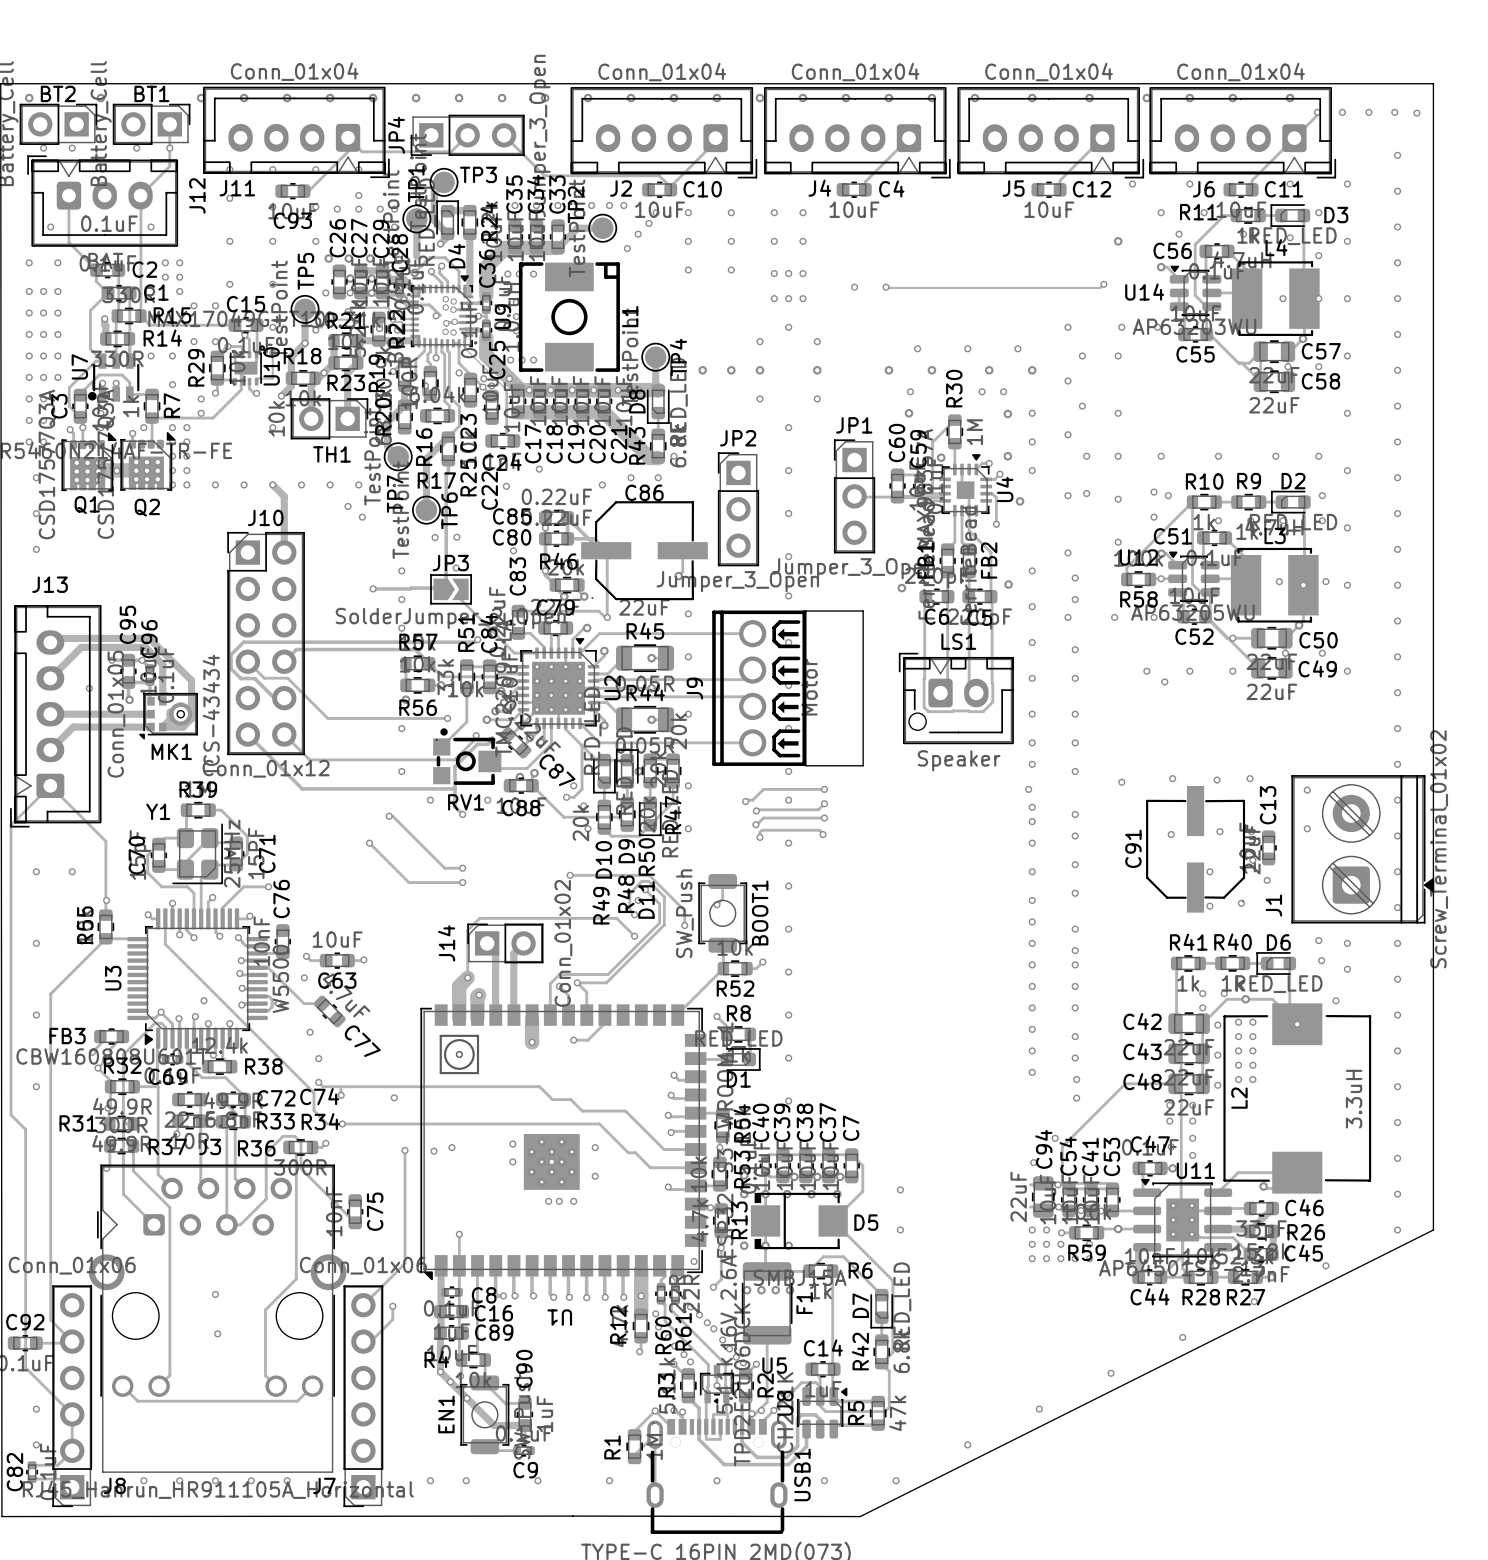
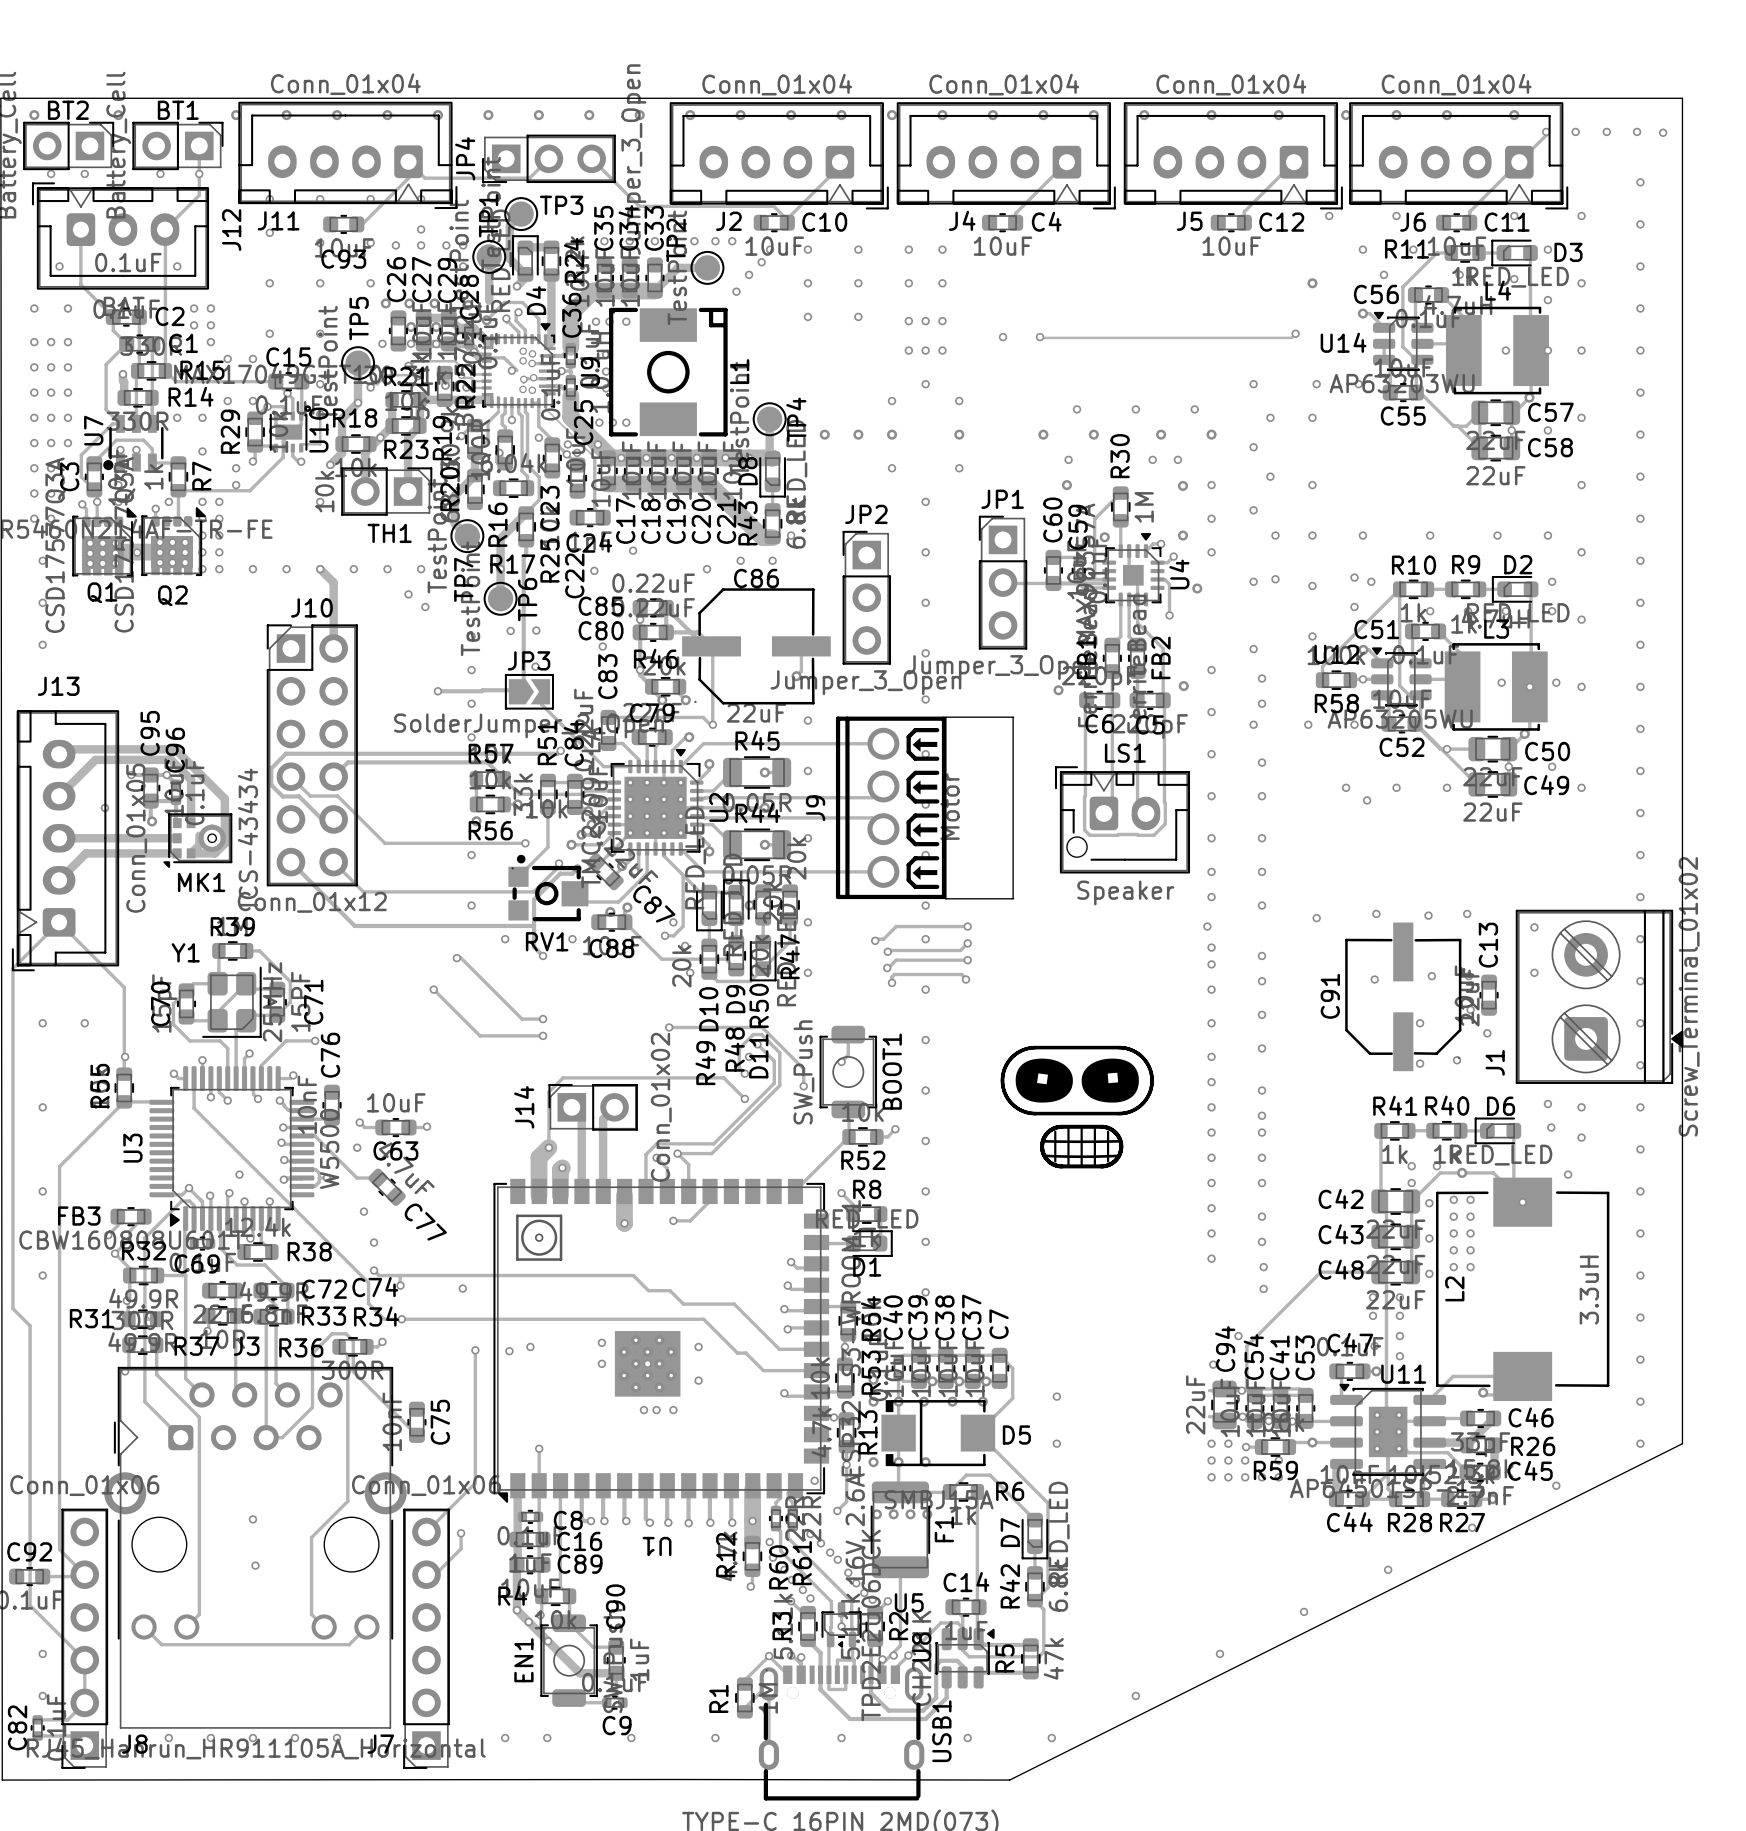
line: none -> (1033, 1047) (1022, 1050) (1013, 1056) (1006, 1064) (1002, 1075) (1003, 1087) (1007, 1097) (1014, 1106) (1024, 1111) (1035, 1113) (1124, 1113) (1140, 1106) (1150, 1091) (1152, 1078) (1148, 1066) (1141, 1056) (1130, 1049) (1119, 1047) (1033, 1047)
drawing: none -> [1015, 1058, 1139, 1103]
line: none -> (1059, 1126) (1048, 1131) (1042, 1143) (1044, 1156) (1053, 1164) (1060, 1166) (1104, 1166) (1113, 1162) (1119, 1155) (1121, 1147) (1120, 1139) (1110, 1128) (1102, 1126) (1059, 1126)
line: none -> (1081, 1127) (1081, 1165)
line: none -> (1068, 1128) (1068, 1164)
line: none -> (1094, 1128) (1094, 1164)
line: none -> (1055, 1131) (1055, 1161)
line: none -> (1108, 1131) (1108, 1161)
line: none -> (1044, 1141) (1119, 1141)
line: none -> (1044, 1155) (1119, 1155)

